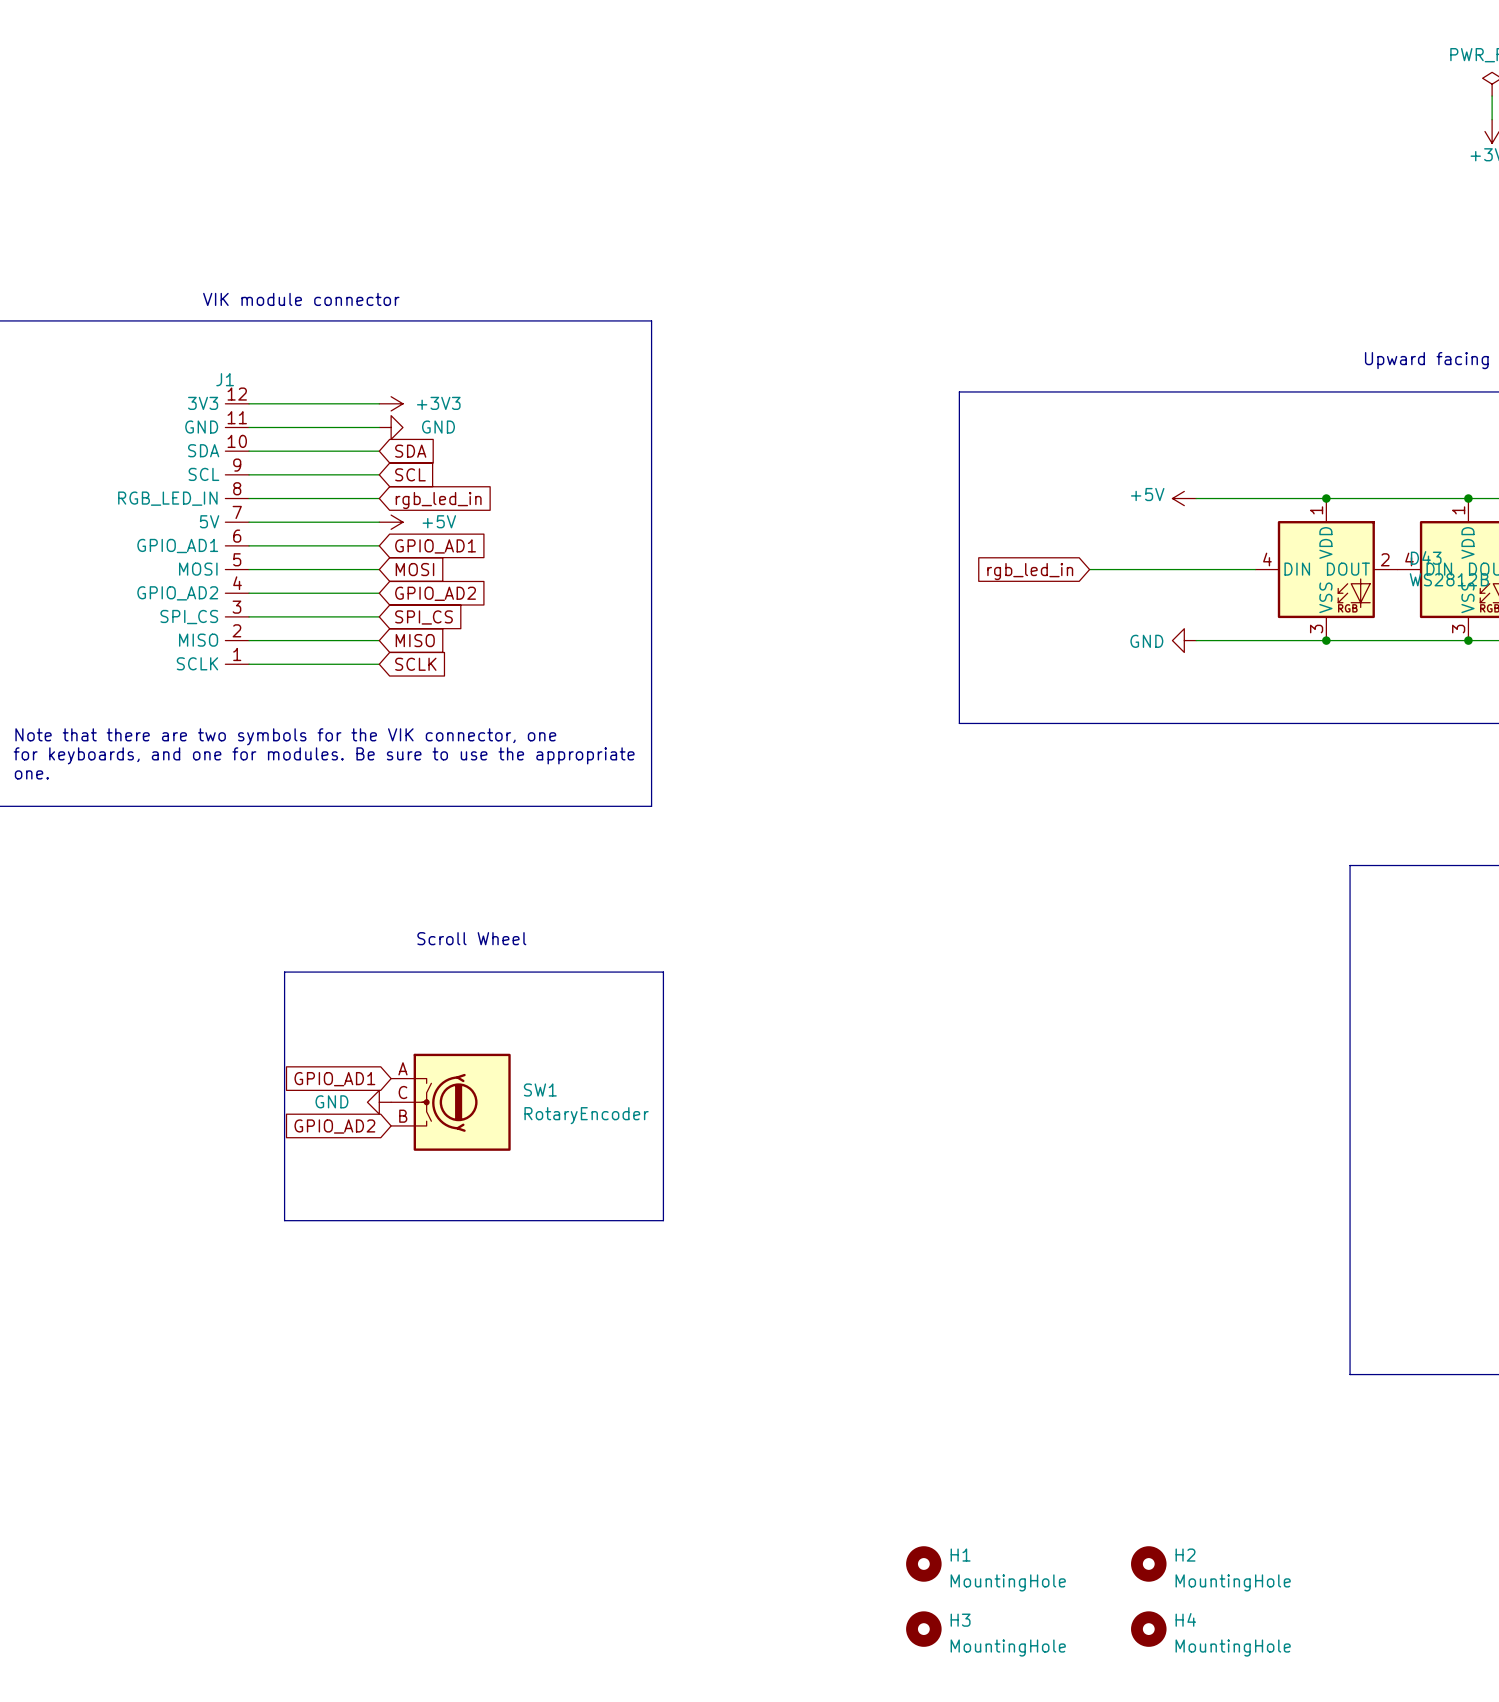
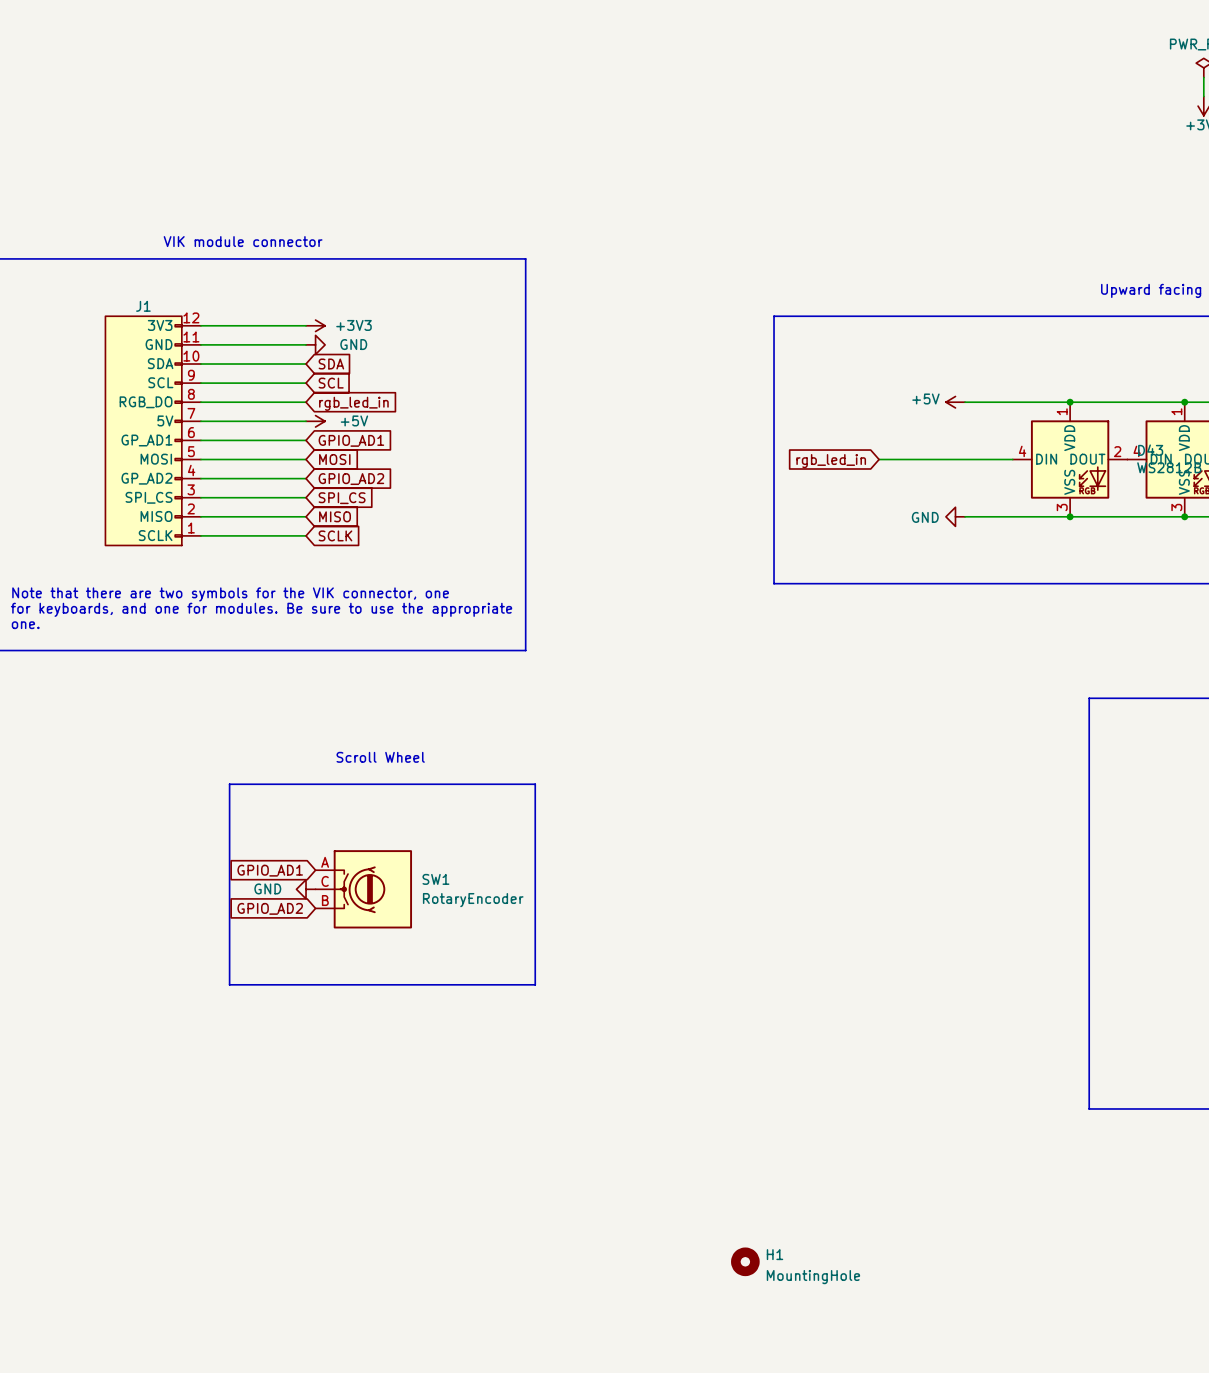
J1 symbol: [225, 403, 250, 665] -> [105, 316, 201, 546]
H2: MountingHole (1148, 1563) -> none
H3: MountingHole (923, 1629) -> none
H4: MountingHole (1148, 1629) -> none

